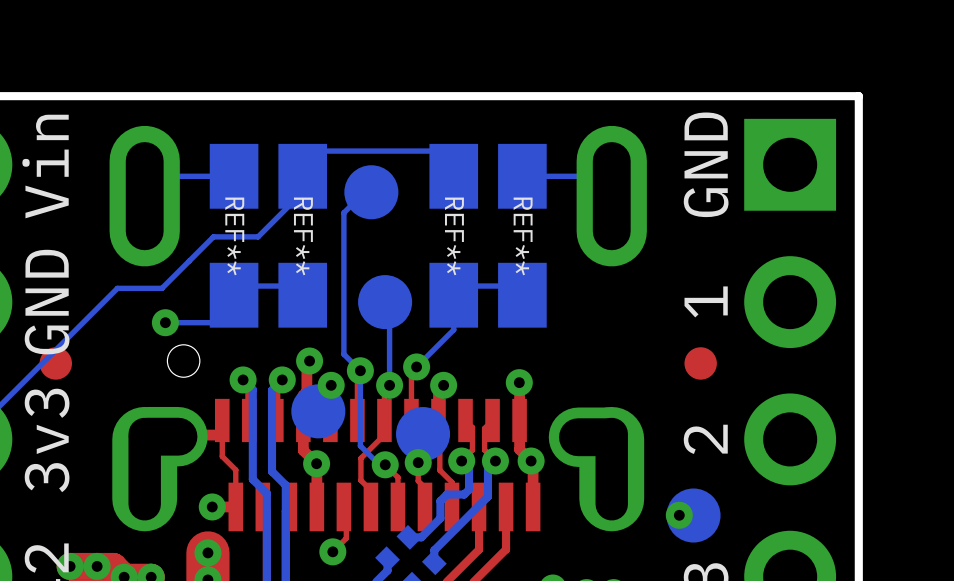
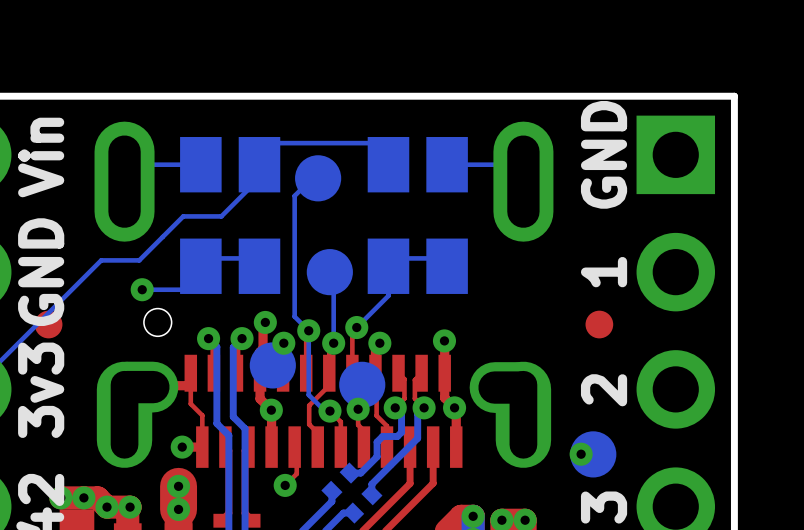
REF** name: REF** (234, 236) -> none
REF** name: REF** (303, 236) -> none
REF** name: REF** (454, 236) -> none
REF** name: REF** (523, 236) -> none

